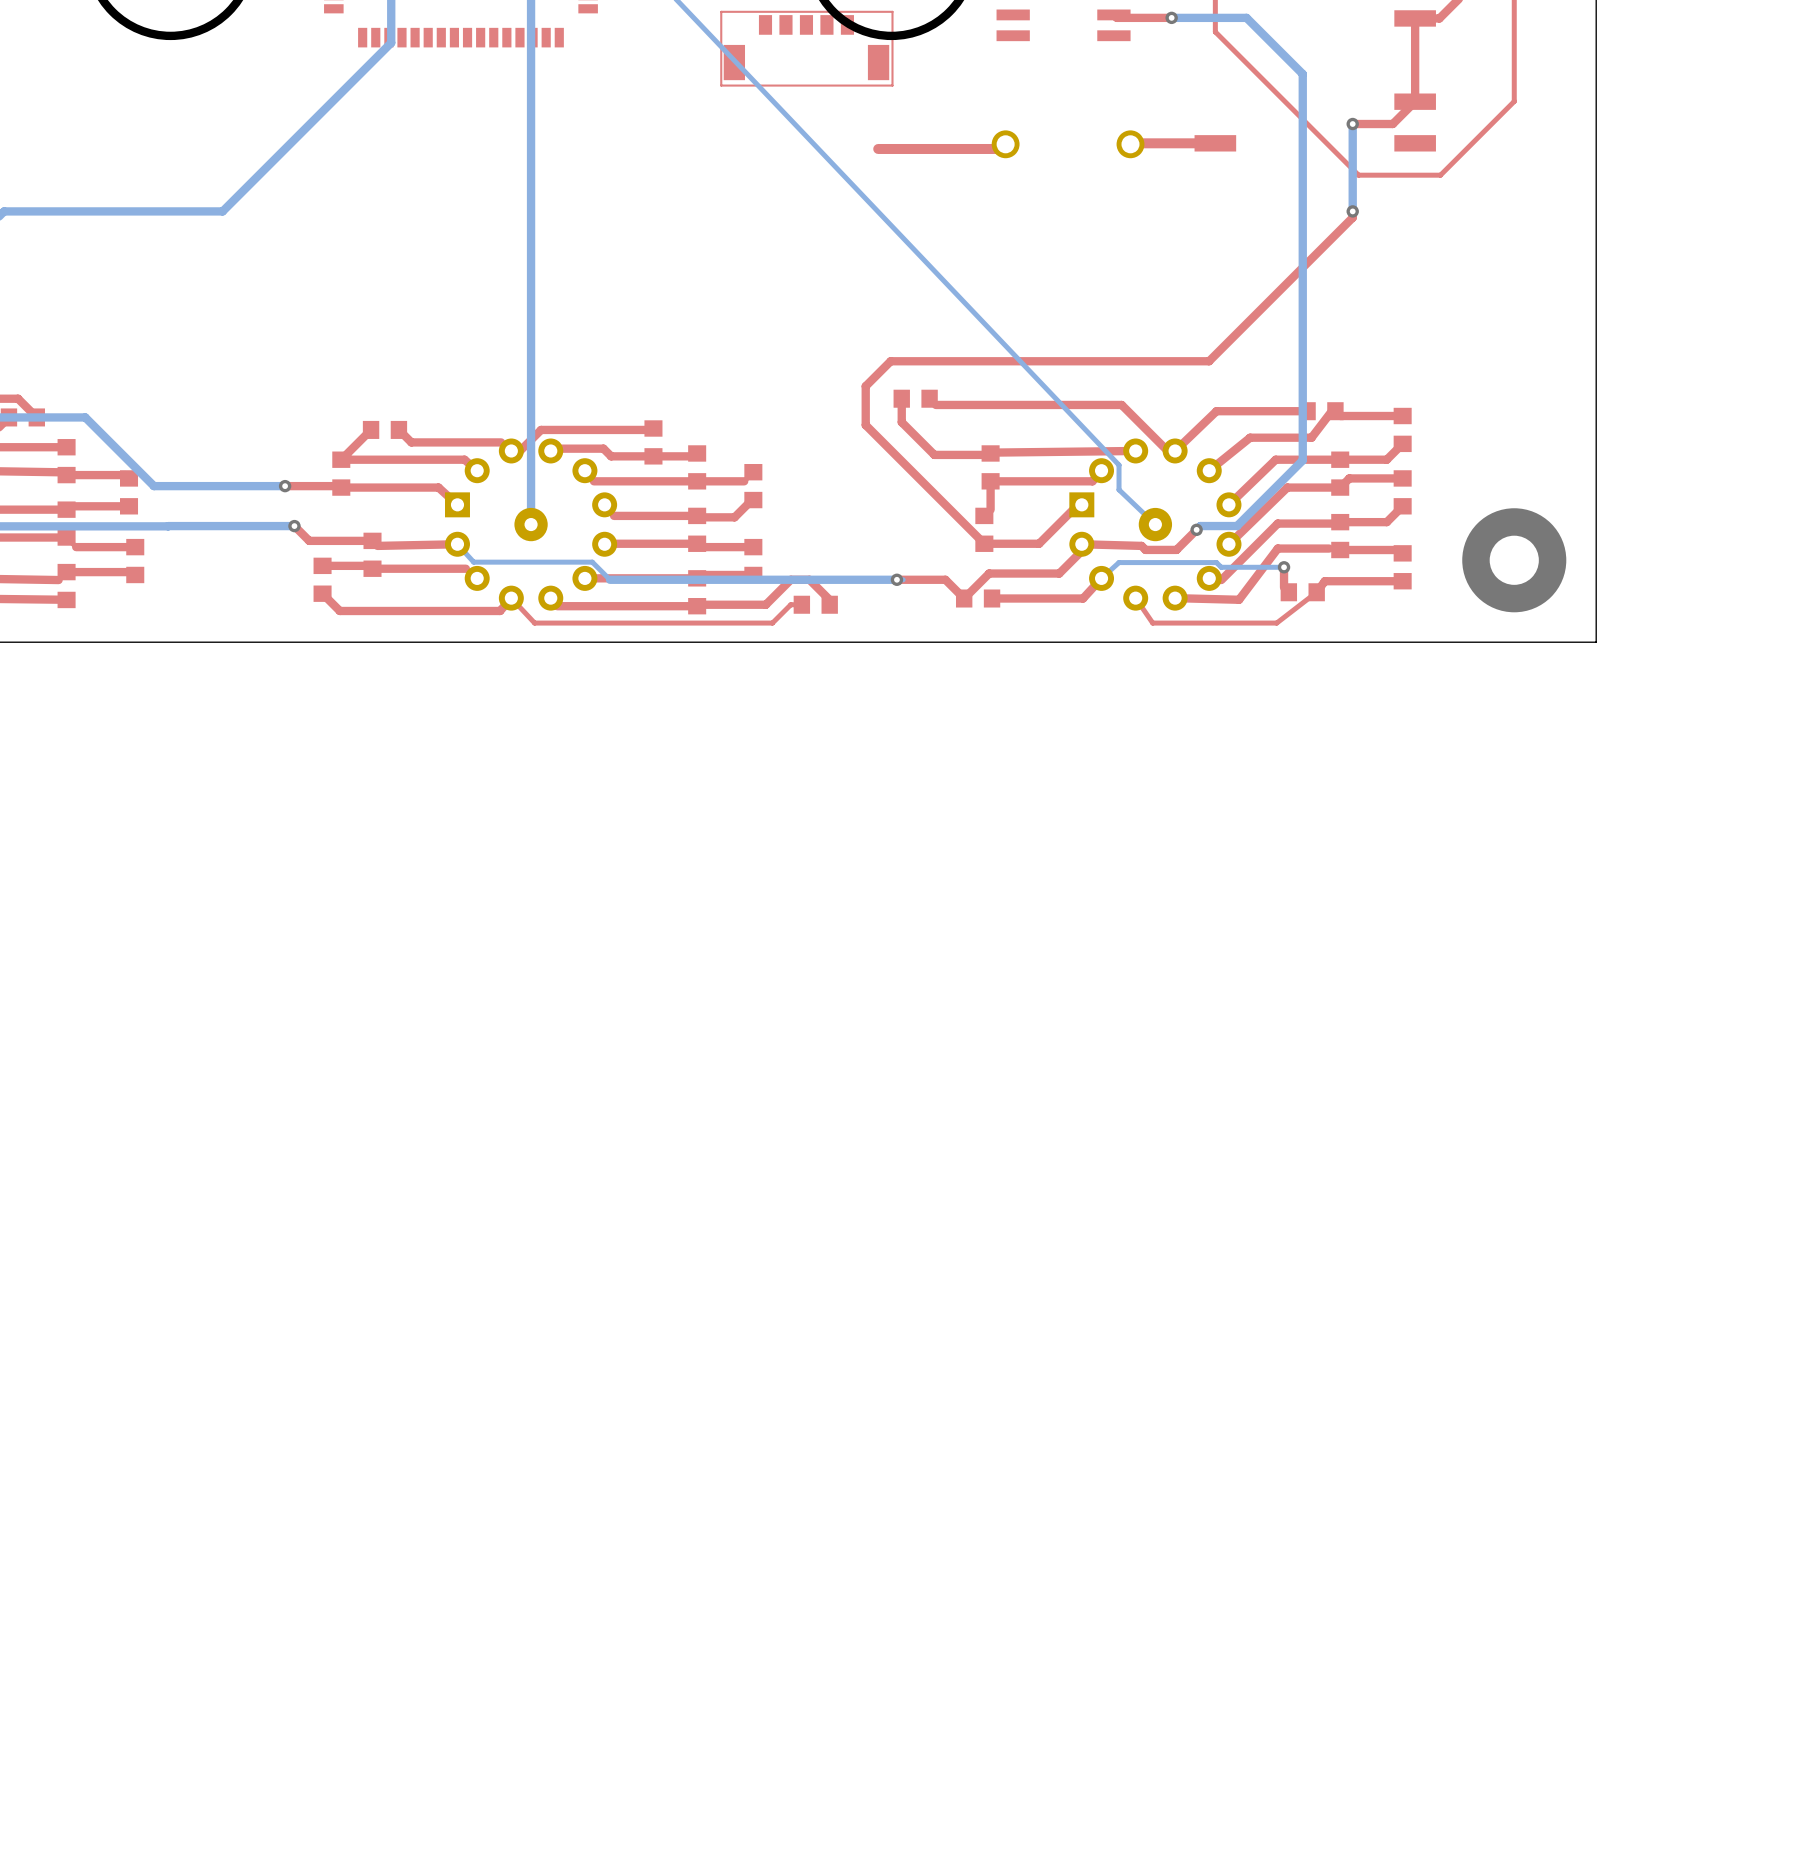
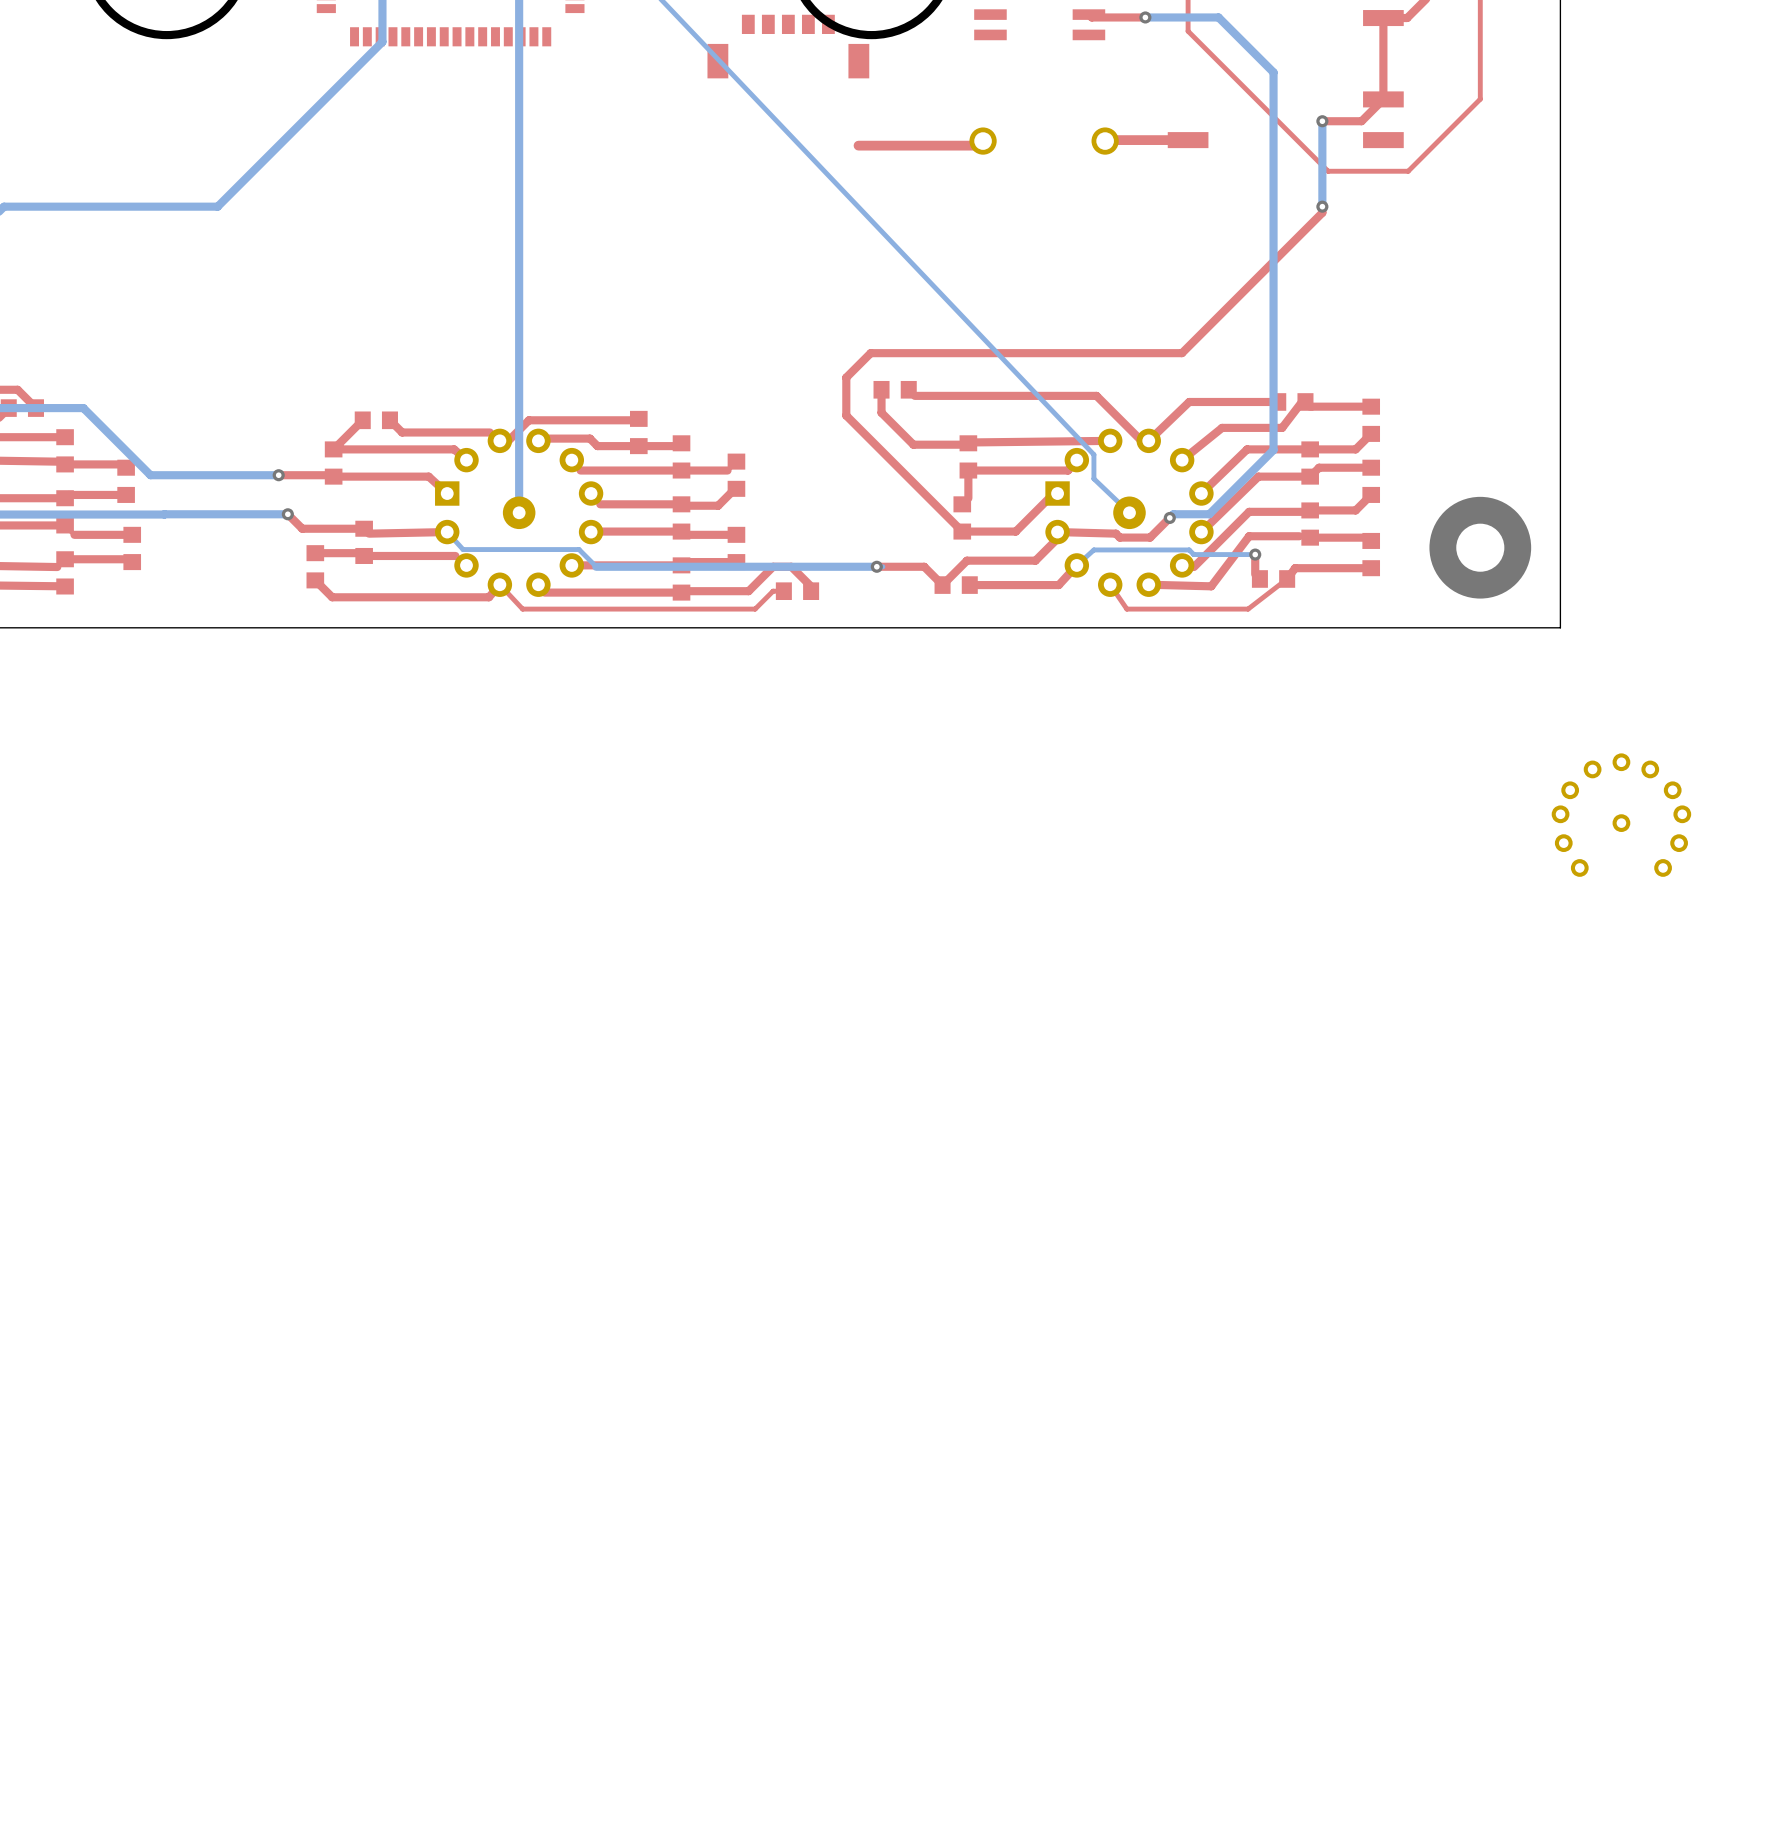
part footprint: [720, 10, 894, 87] -> [707, 14, 870, 79]
part: none -> (1621, 815)

